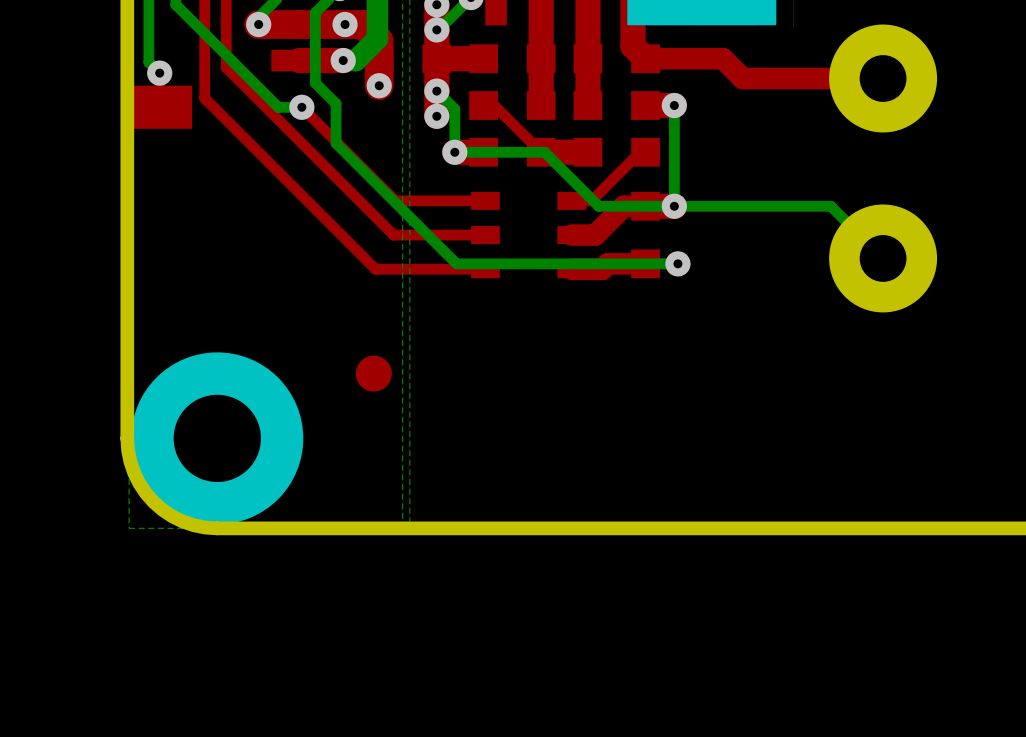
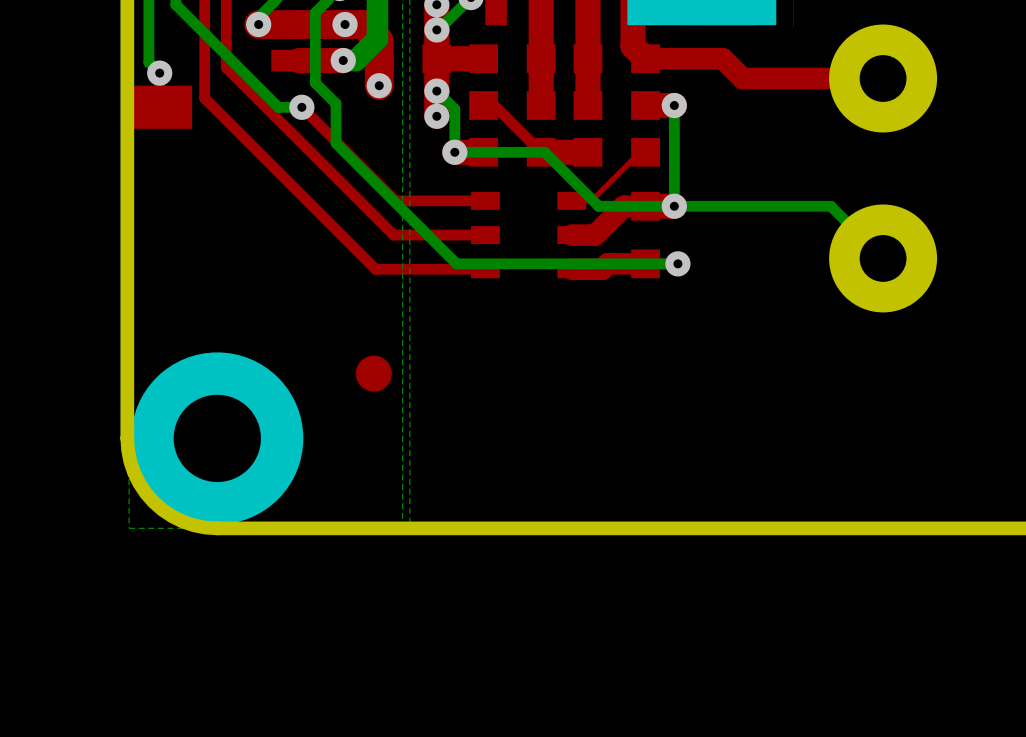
top track width: thick (645, 152) (640, 152) (591, 200) (571, 200) -> thin (645, 152) (640, 152) (591, 200) (571, 200)

